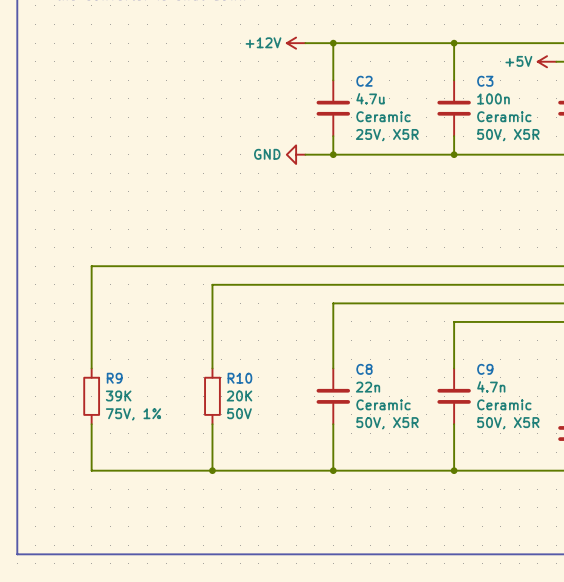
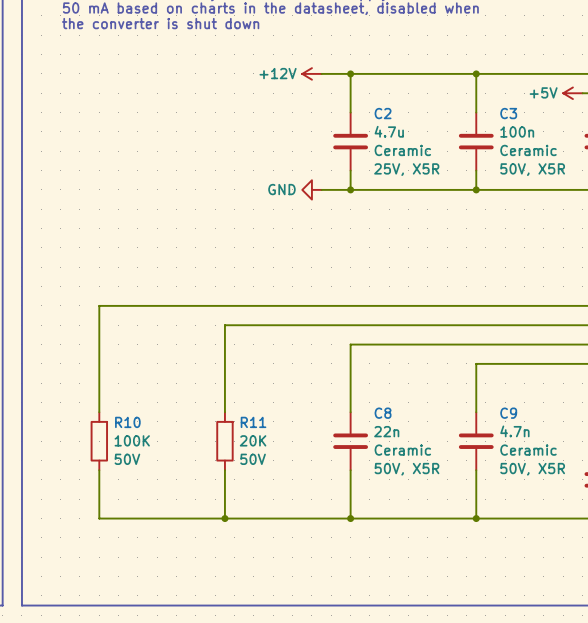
R9 name: R9 (114, 378) -> R10 (127, 422)
R10 name: R10 (239, 378) -> R11 (253, 422)
R9 value: 39K (118, 395) -> 100K (132, 440)
R9 text: 75V, 1% (133, 414) -> 50V (127, 459)

